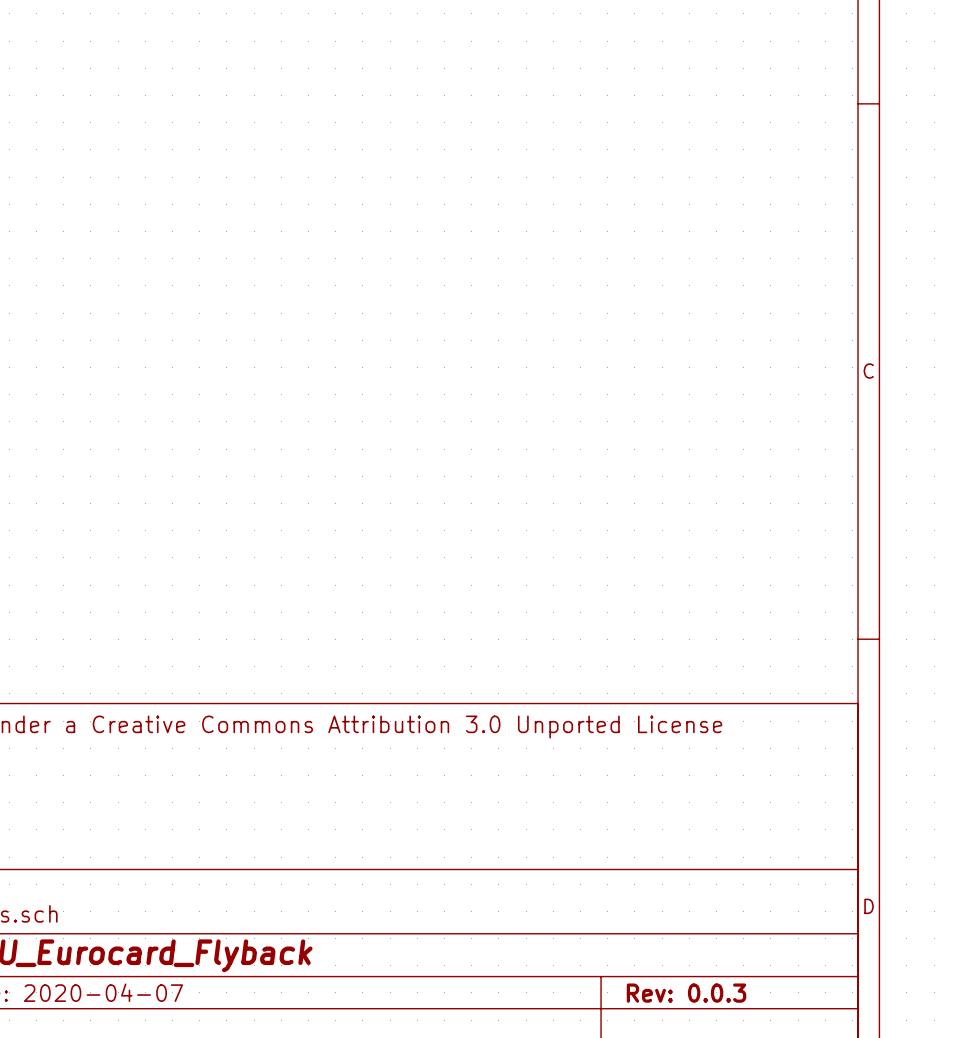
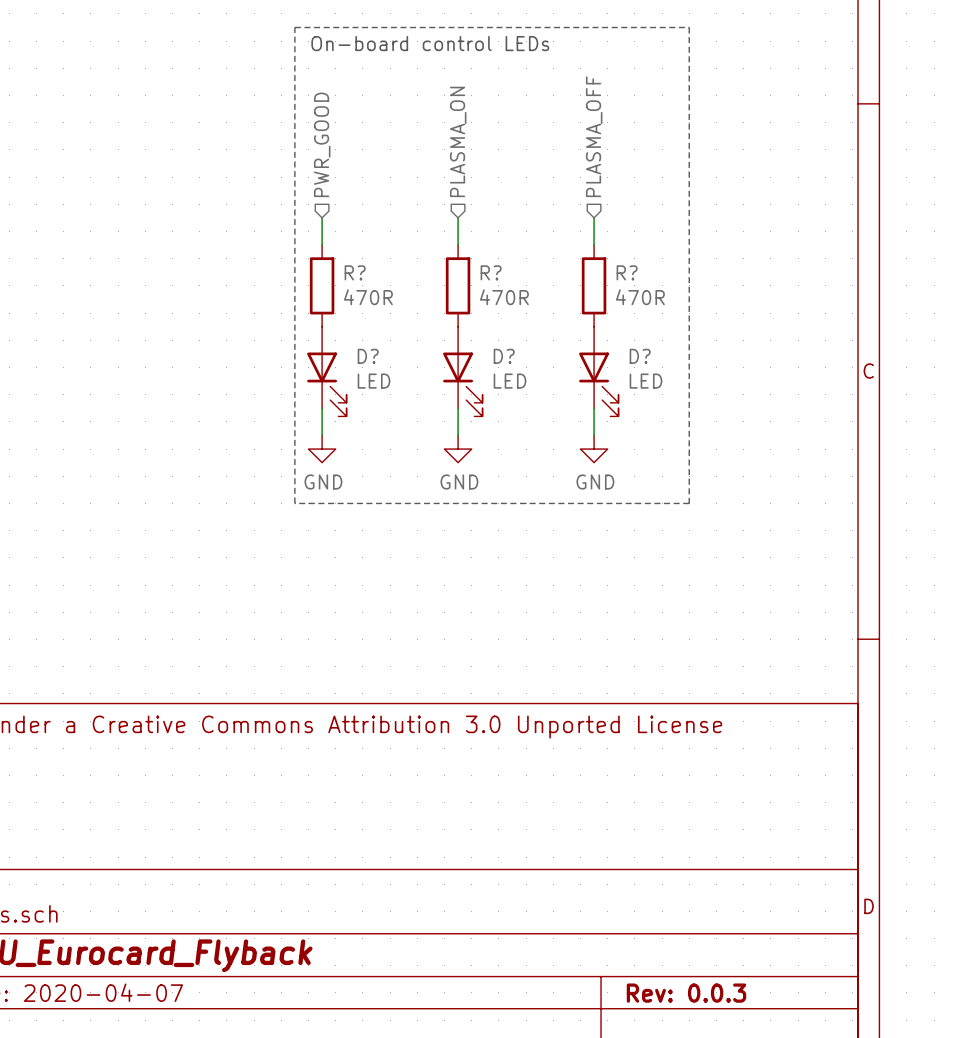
line: none -> (294, 27) (294, 503) (689, 503) (689, 27) (294, 27)
text: none -> On-board control LEDs (430, 43)
hierarchical label: none -> PLASMA_OFF (594, 136)
hierarchical label: none -> PLASMA_ON (458, 141)
hierarchical label: none -> PWR_GOOD (322, 144)
wire: none -> (322, 217) (322, 245)
wire: none -> (458, 217) (458, 245)
wire: none -> (594, 217) (594, 245)
R?: none -> 470R (322, 285)
R?: none -> 470R (458, 285)
R?: none -> 470R (594, 285)
D?: none -> LED (326, 371)
D?: none -> LED (462, 371)
D?: none -> LED (598, 371)
wire: none -> (322, 408) (322, 435)
wire: none -> (458, 408) (458, 435)
wire: none -> (594, 408) (594, 435)
power symbol: none -> GND (322, 449)
power symbol: none -> GND (458, 449)
power symbol: none -> GND (594, 449)

